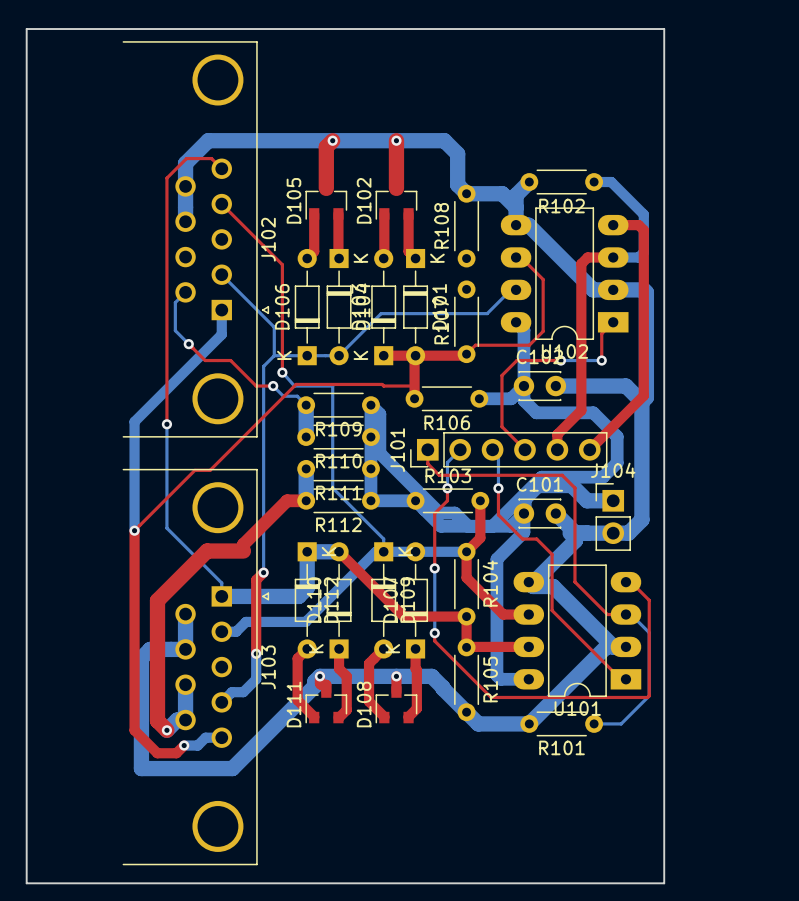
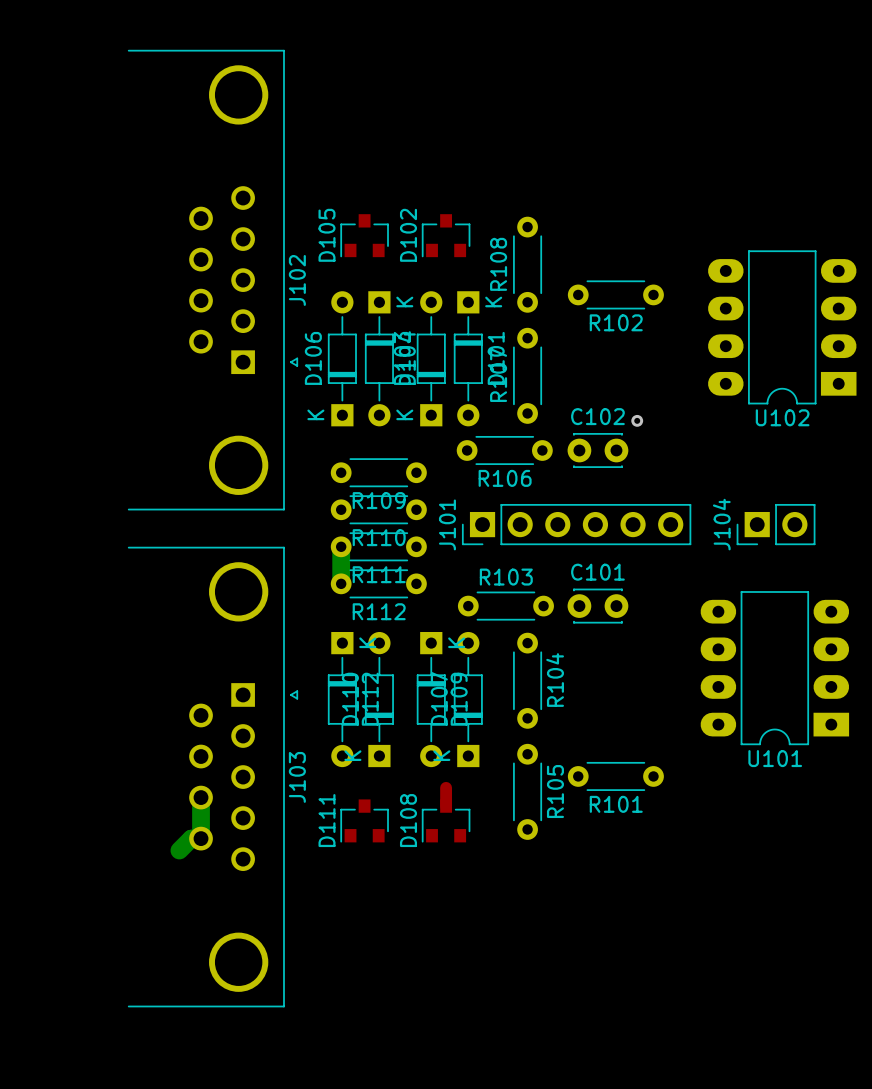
board edge: (26, 29) (26, 883) (664, 883) (664, 29) (26, 29) -> none
top track: (332, 140) (326, 147) (326, 188) -> none
via: (332, 140) -> none
top track: (396, 140) (396, 188) -> none
via: (396, 140) -> none
top track: (221, 168) (211, 158) (186, 158) (166, 178) (166, 424) -> none
bottom track: (529, 182) (516, 195) (516, 225) (528, 225) (593, 289) (643, 289) (646, 292) (646, 397) (641, 401) -> none
R102 position: (561, 182) -> (615, 294)
bottom track: (594, 182) (611, 182) (643, 214) (643, 252) (638, 257) (613, 257) -> none
top track: (221, 204) (282, 264) (282, 372) -> none
bottom track: (516, 207) (502, 193) (466, 193) (457, 184) (457, 153) (444, 140) (208, 140) (185, 163) (185, 221) -> none
top track: (314, 213) (314, 251) (307, 258) -> none
top track: (338, 213) (339, 258) -> none
top track: (384, 213) (383, 258) -> none
top track: (408, 213) (408, 251) (415, 258) -> none
top track: (613, 225) (638, 225) (643, 230) (643, 395) (589, 449) -> none
top track: (516, 257) (521, 257) (543, 279) (543, 331) (529, 345) (475, 345) (465, 355) (383, 355) -> none
top track: (613, 257) (587, 257) (581, 263) (581, 410) (557, 434) (557, 449) -> none
U102 position: (564, 273) -> (782, 327)
bottom track: (221, 274) (274, 327) (274, 355) -> none
bottom track: (516, 289) (510, 289) (487, 313) (381, 313) (339, 355) (274, 355) -> none
bottom track: (185, 292) (175, 302) (175, 330) (191, 346) -> none
bottom track: (221, 310) (221, 334) (134, 421) (134, 530) -> none
bottom track: (516, 322) (523, 330) (523, 400) (536, 412) (593, 412) (617, 436) (617, 462) (602, 477) (541, 477) (492, 526) -> none
top track: (613, 322) (601, 333) (601, 360) -> none
top track: (188, 344) (205, 360) (230, 360) (256, 386) (273, 386) -> none
via: (188, 344) -> none
bottom track: (274, 355) (263, 366) (263, 572) -> none
top track: (415, 355) (414, 398) (414, 386) -> none
bottom track: (560, 360) (601, 360) -> none
top track: (560, 360) (516, 360) (501, 375) (501, 426) (524, 449) -> none
via: (601, 360) -> none
via: (282, 372) -> none
bottom track: (281, 373) (294, 386) (332, 386) (332, 488) (383, 539) (383, 551) -> none
bottom track: (273, 386) (283, 396) (297, 396) (306, 405) (306, 437) -> none
via: (273, 386) -> none
top track: (414, 386) (296, 384) (210, 470) (194, 470) (134, 530) (134, 730) (157, 753) (176, 753) (184, 745) -> none
bottom track: (523, 386) (511, 398) (479, 398) -> none
C102 position: (539, 386) -> (597, 450)
bottom track: (555, 386) (625, 386) (641, 401) -> none
R106 position: (446, 398) -> (504, 450)
bottom track: (641, 401) (641, 519) (628, 533) (570, 533) -> none
bottom track: (166, 424) (166, 528) (221, 583) (221, 596) (298, 596) (307, 588) (307, 551) (339, 551) -> none
via: (166, 424) -> none
top track: (427, 449) (427, 463) (439, 475) (562, 475) (574, 488) (574, 582) (607, 614) (625, 614) -> none
bottom track: (460, 449) (447, 462) (447, 488) -> none
bottom track: (492, 449) (498, 455) (498, 488) -> none
top track: (447, 488) (447, 500) (434, 513) (434, 568) -> none
via: (447, 488) -> none
top track: (498, 488) (498, 514) (522, 539) (536, 539) (552, 554) (552, 610) (620, 679) (625, 679) -> none
via: (498, 488) -> none
top track: (306, 500) (287, 500) (243, 544) (243, 551) (207, 551) (157, 600) (157, 720) (166, 730) -> none
R103 position: (447, 500) -> (505, 606)
top track: (480, 500) (480, 538) (466, 551) (466, 577) (503, 614) (528, 614) -> none
bottom track: (613, 500) (587, 500) (571, 485) (537, 485) (523, 499) (523, 513) -> none
bottom track: (523, 513) (511, 526) (441, 526) (415, 500) (370, 500) (370, 405) (379, 414) (379, 453) (439, 513) (454, 513) (468, 526) -> none
bottom track: (523, 513) (523, 532) (496, 559) (496, 675) (500, 679) (528, 679) -> none
C101 position: (539, 513) -> (597, 606)
bottom track: (555, 513) (575, 533) (575, 540) (533, 582) (528, 582) (533, 586) (553, 586) (613, 646) -> none
J104 rotation: 0° (613, 516) -> 90° counterclockwise (776, 524)
J104 position: (613, 516) -> (776, 524)
via: (134, 530) -> none
top track: (339, 551) (403, 616) (466, 616) (466, 647) (528, 646) -> none
bottom track: (466, 551) (375, 551) (305, 621) (246, 621) (236, 631) (221, 631) -> none
bottom track: (434, 568) (434, 633) -> none
via: (434, 568) -> none
top track: (263, 572) (256, 580) (256, 653) -> none
via: (263, 572) -> none
top track: (625, 582) (631, 582) (649, 600) (649, 695) (647, 697) (491, 697) (434, 641) (434, 633) -> none
bottom track: (185, 614) (185, 649) (150, 649) (141, 658) (141, 768) (232, 768) (314, 686) (314, 681) (319, 676) (431, 676) (478, 723) (529, 723) (606, 646) (625, 646) -> none
bottom track: (625, 614) (631, 614) (649, 632) (649, 695) (621, 723) (594, 723) -> none
U101 position: (577, 630) -> (774, 668)
via: (434, 633) -> none
top track: (307, 648) (297, 658) (297, 700) (314, 717) -> none
top track: (339, 648) (339, 668) (346, 676) (346, 710) (338, 717) -> none
top track: (383, 648) (369, 663) (369, 701) (384, 717) -> none
top track: (415, 648) (416, 708) (408, 717) -> none
bottom track: (256, 653) (256, 679) (243, 692) (231, 692) (221, 702) -> none
via: (256, 653) -> none
top track: (319, 676) (319, 683) (326, 684) (326, 692) -> none
via: (319, 676) -> none
via: (396, 676) -> none
R101 position: (561, 723) -> (615, 776)
via: (166, 730) -> none
bottom track: (221, 737) (205, 737) (197, 745) (184, 745) -> none
via: (184, 745) -> none

